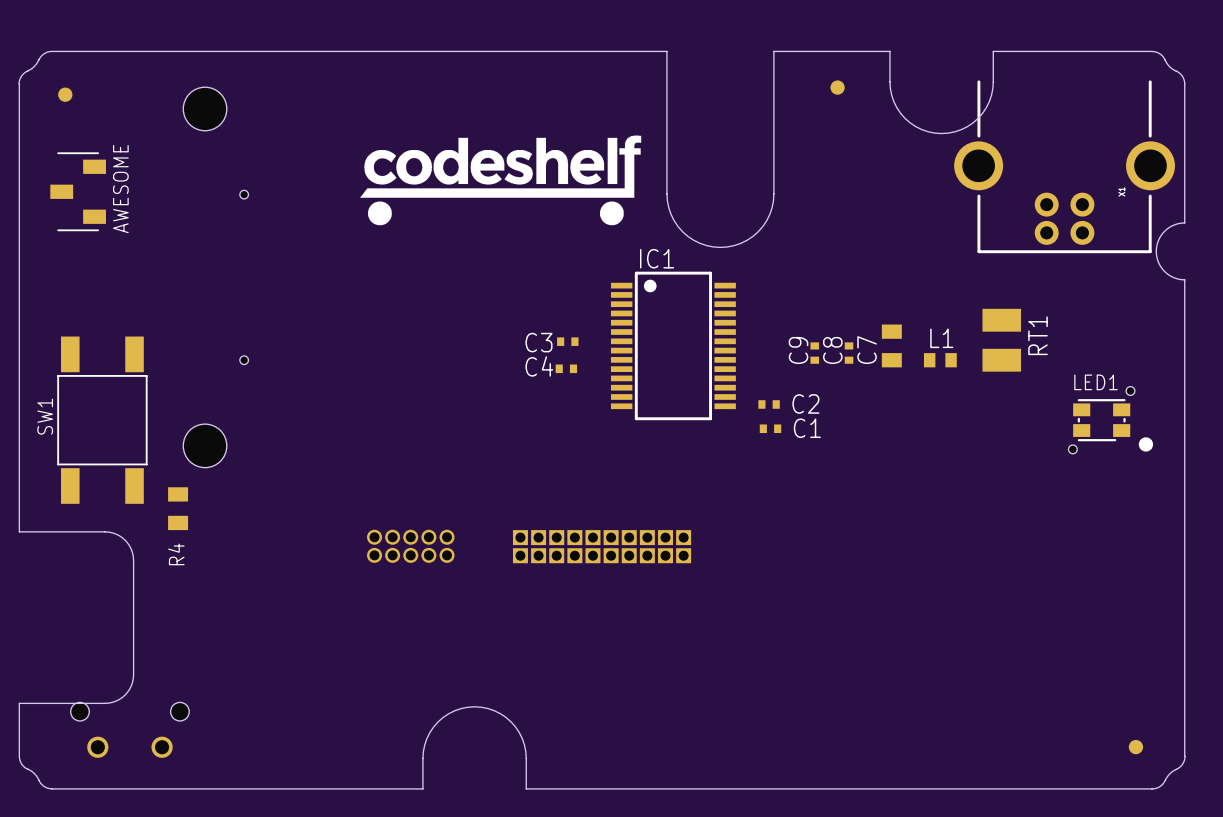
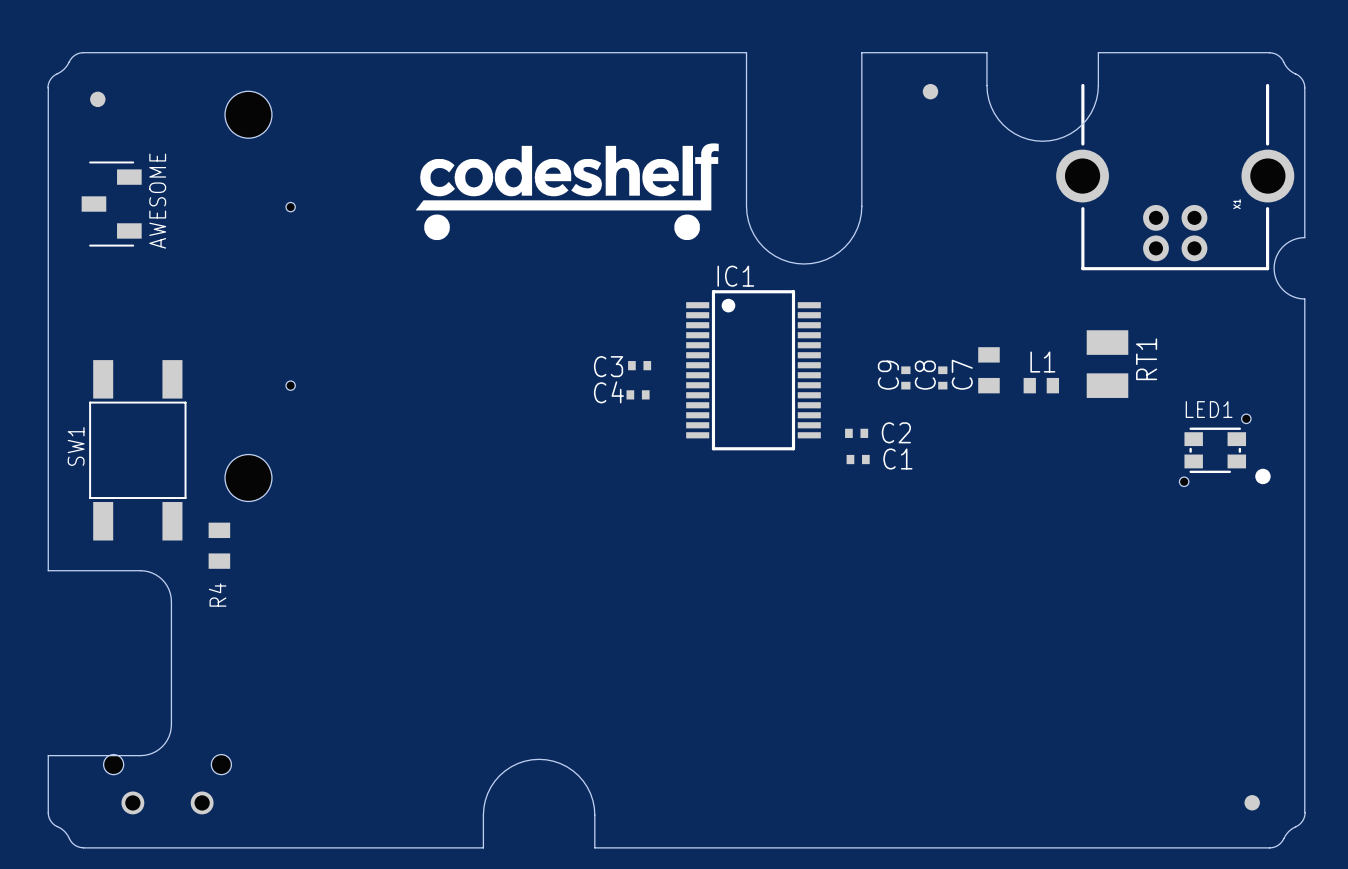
part: (410, 546) -> none
part: (602, 546) -> none

